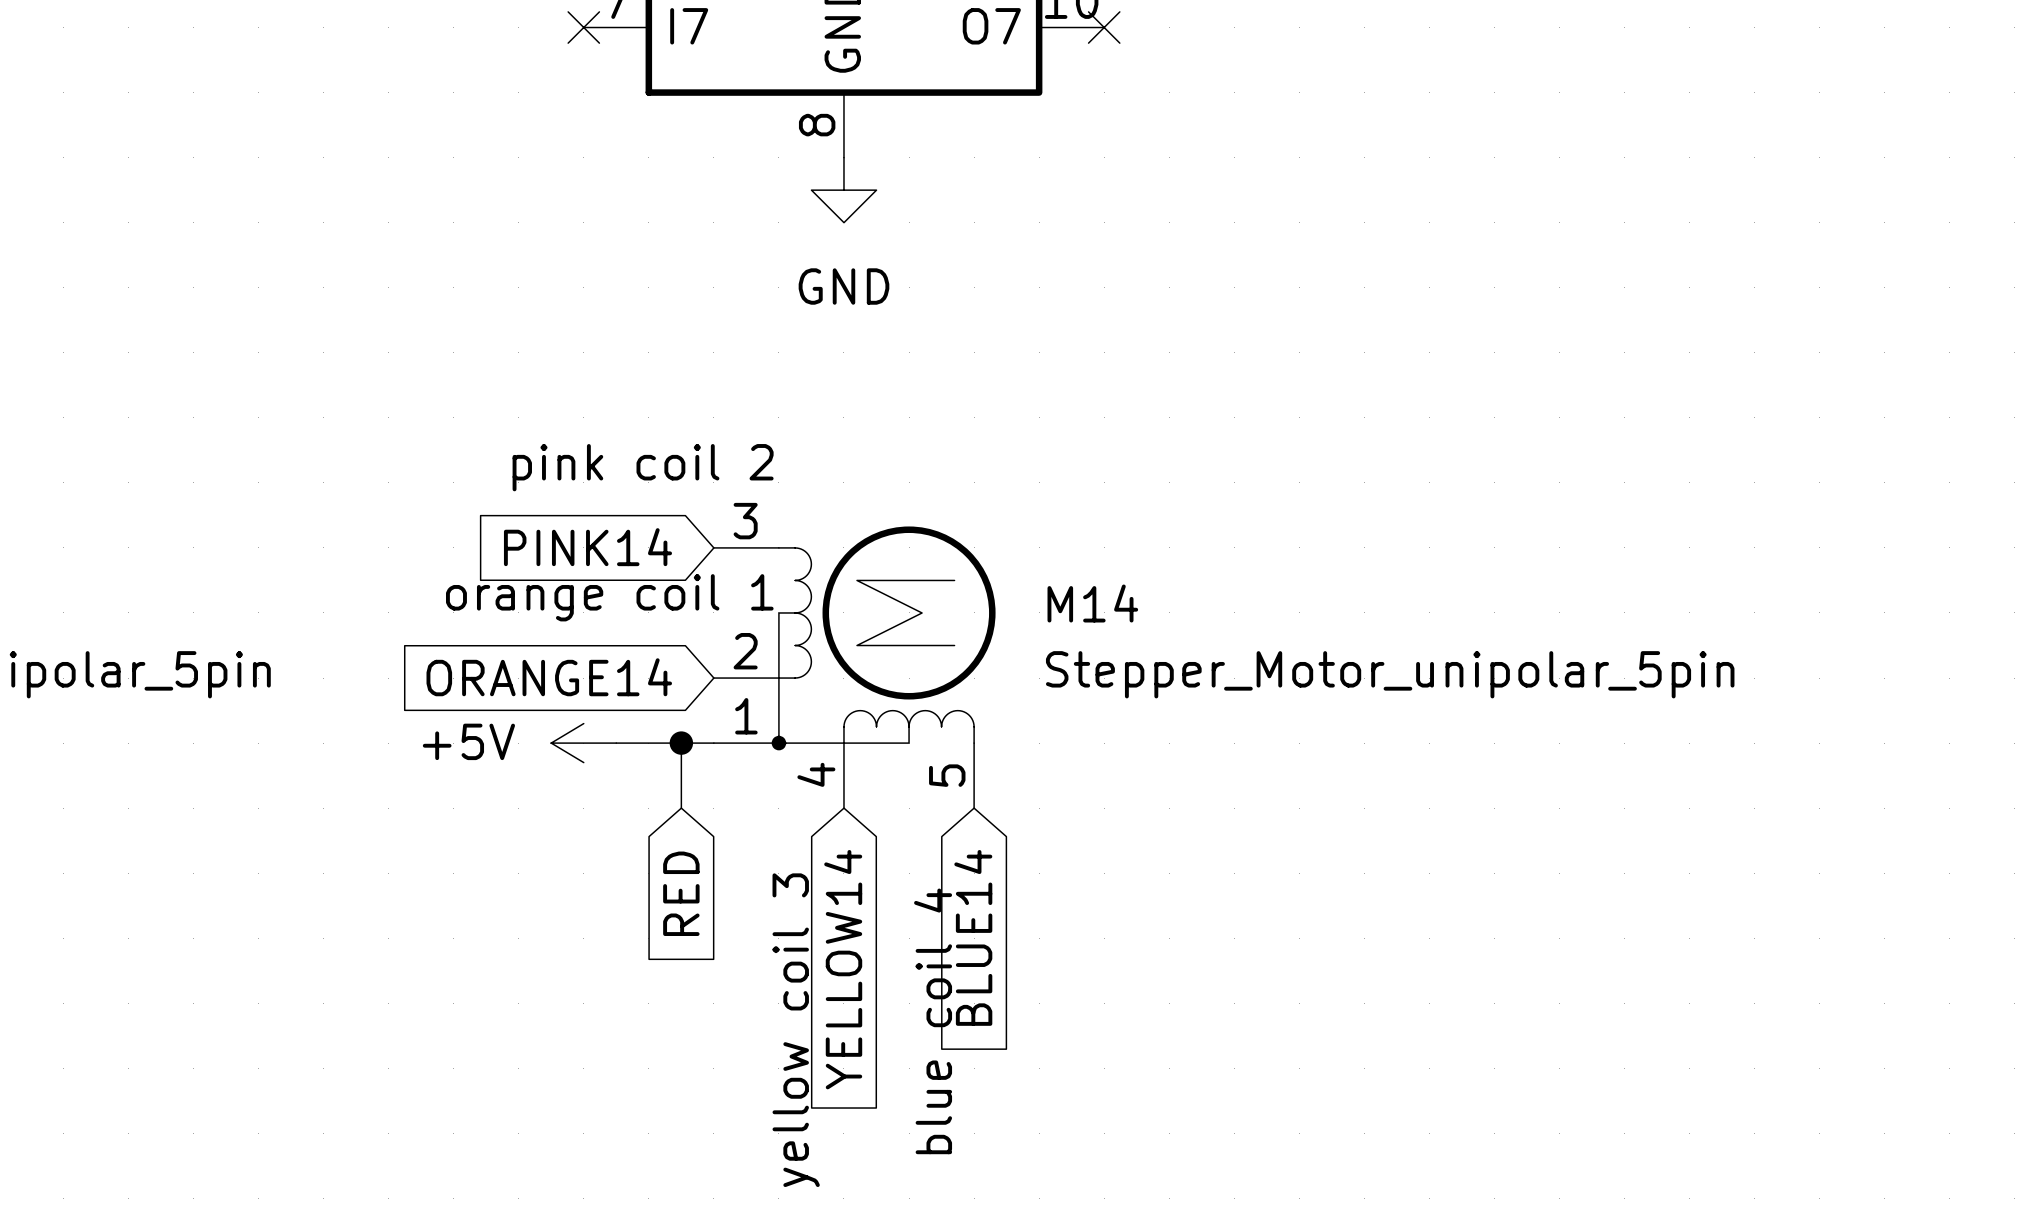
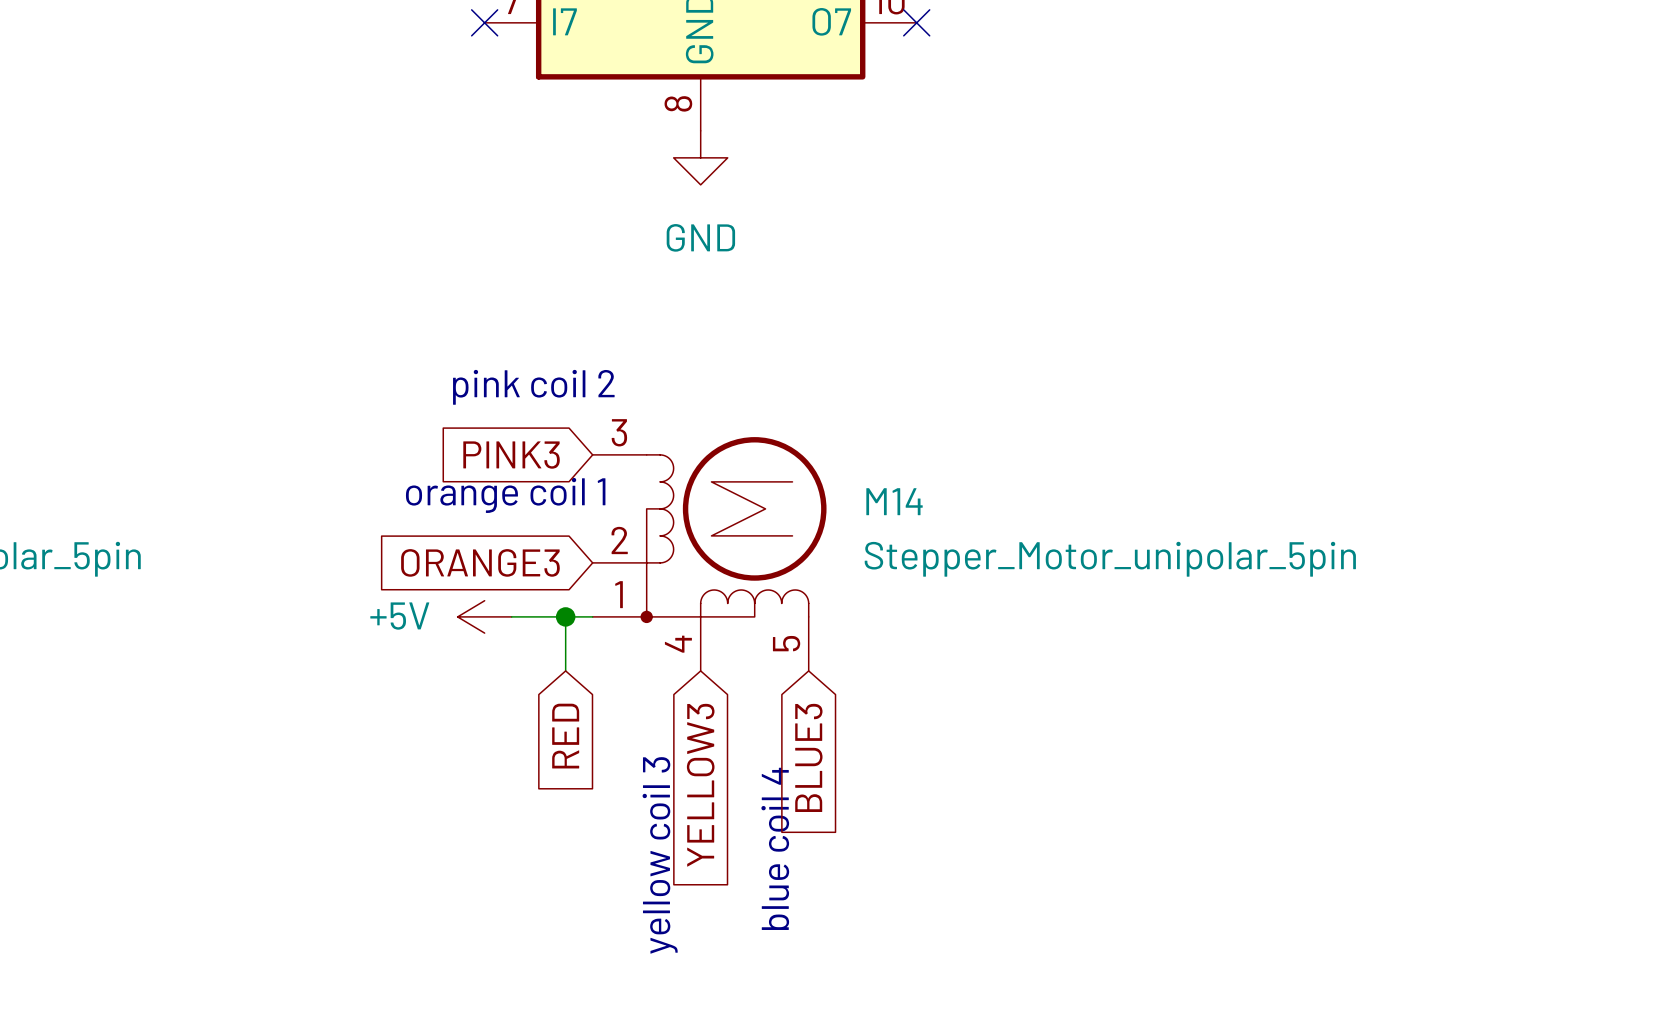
global label: PINK14 (587, 547) -> PINK3 (511, 455)
global label: ORANGE14 (549, 677) -> ORANGE3 (480, 562)
global label: BLUE14 (973, 937) -> BLUE3 (808, 757)
global label: YELLOW14 (843, 969) -> YELLOW3 (700, 785)

